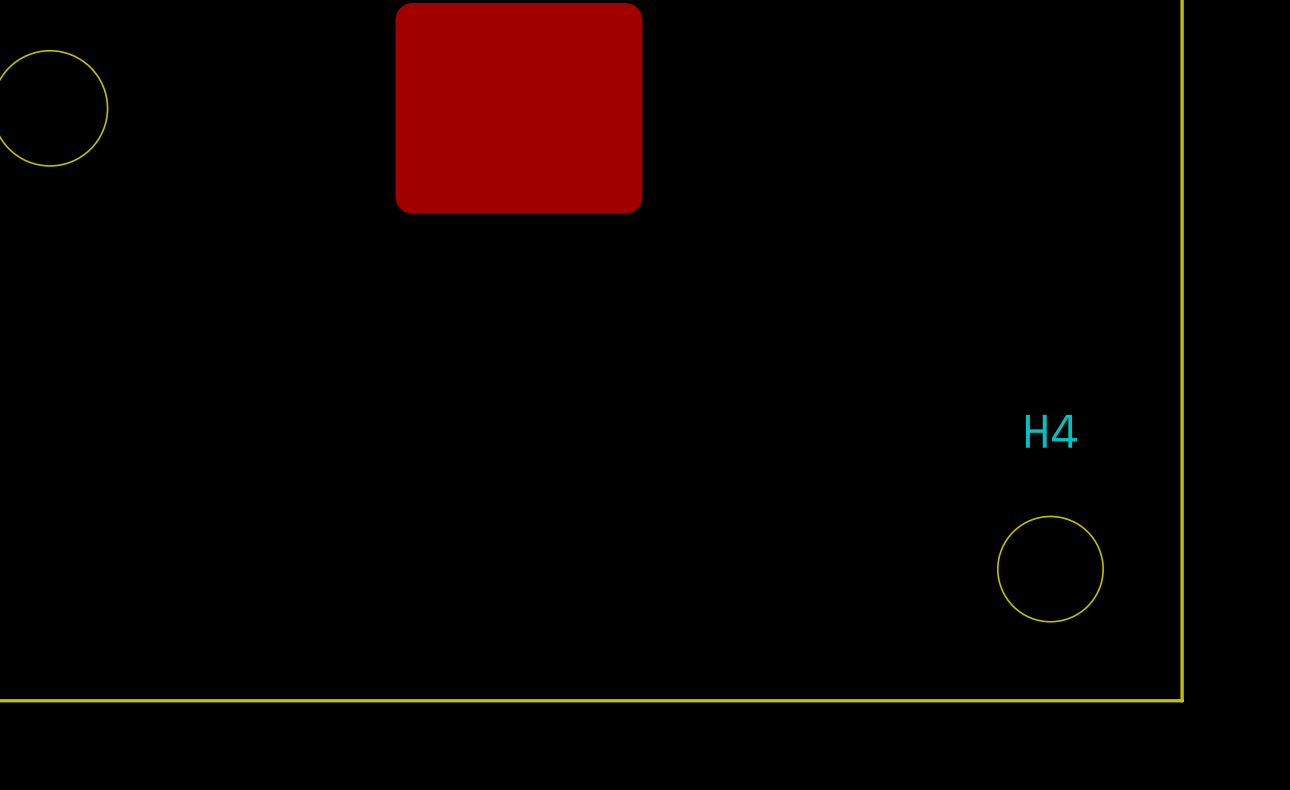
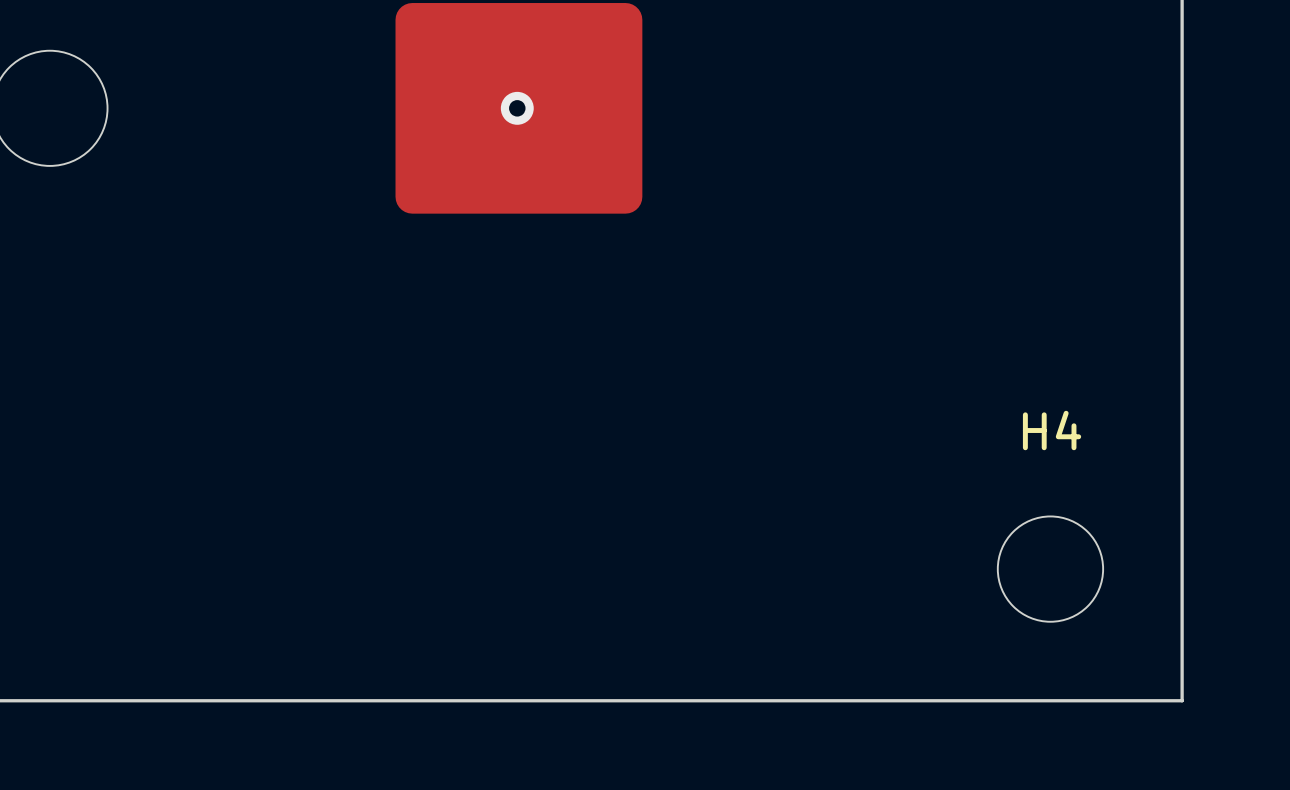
via: none -> (517, 108)

